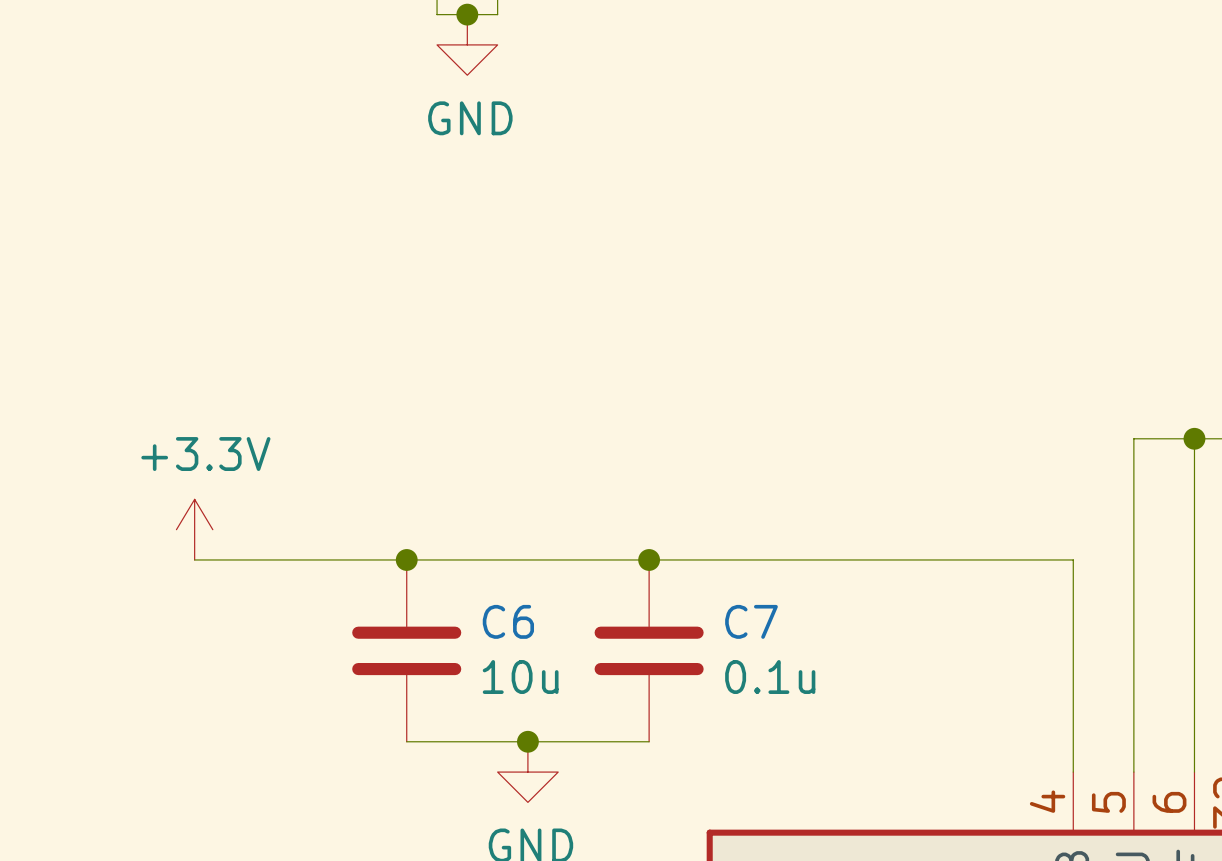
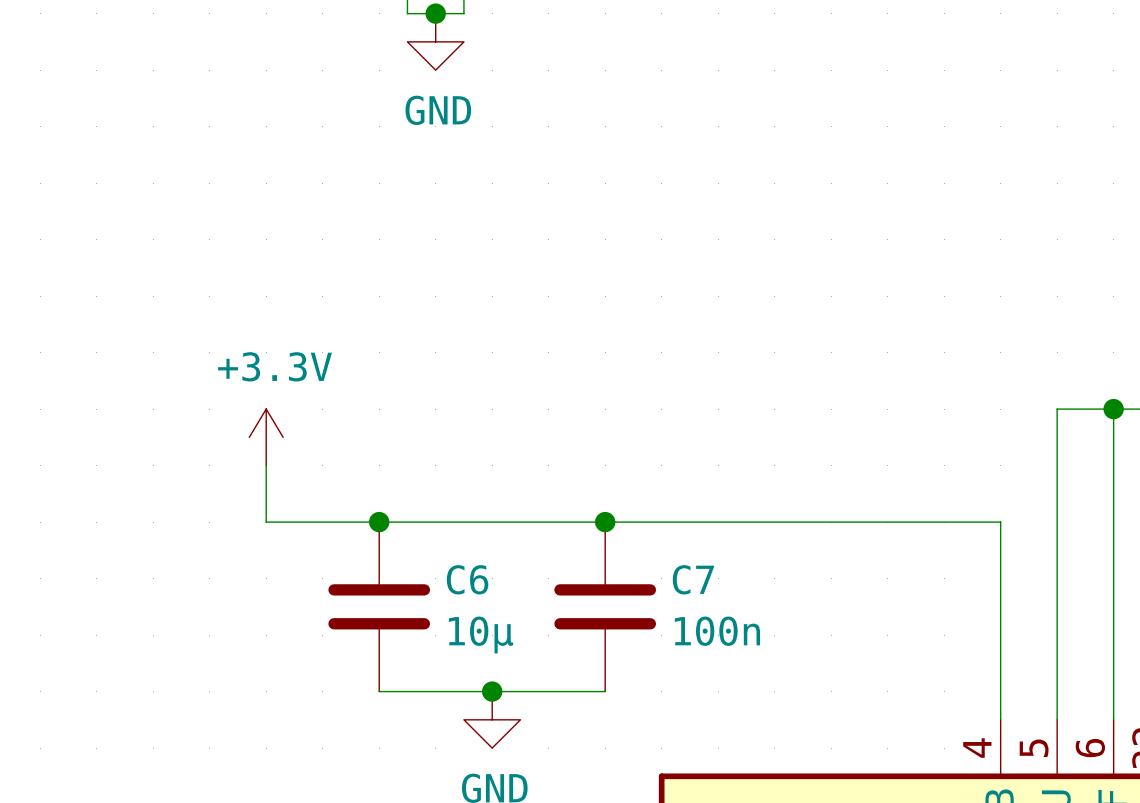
power symbol position: +3.3V (194, 529) -> +3.3V (266, 437)
wire: (194, 559) (285, 559) -> (266, 465) (266, 522)
C6 value: 10u (520, 677) -> 10µ (481, 634)
C7 value: 0.1u (770, 677) -> 100n (717, 631)

